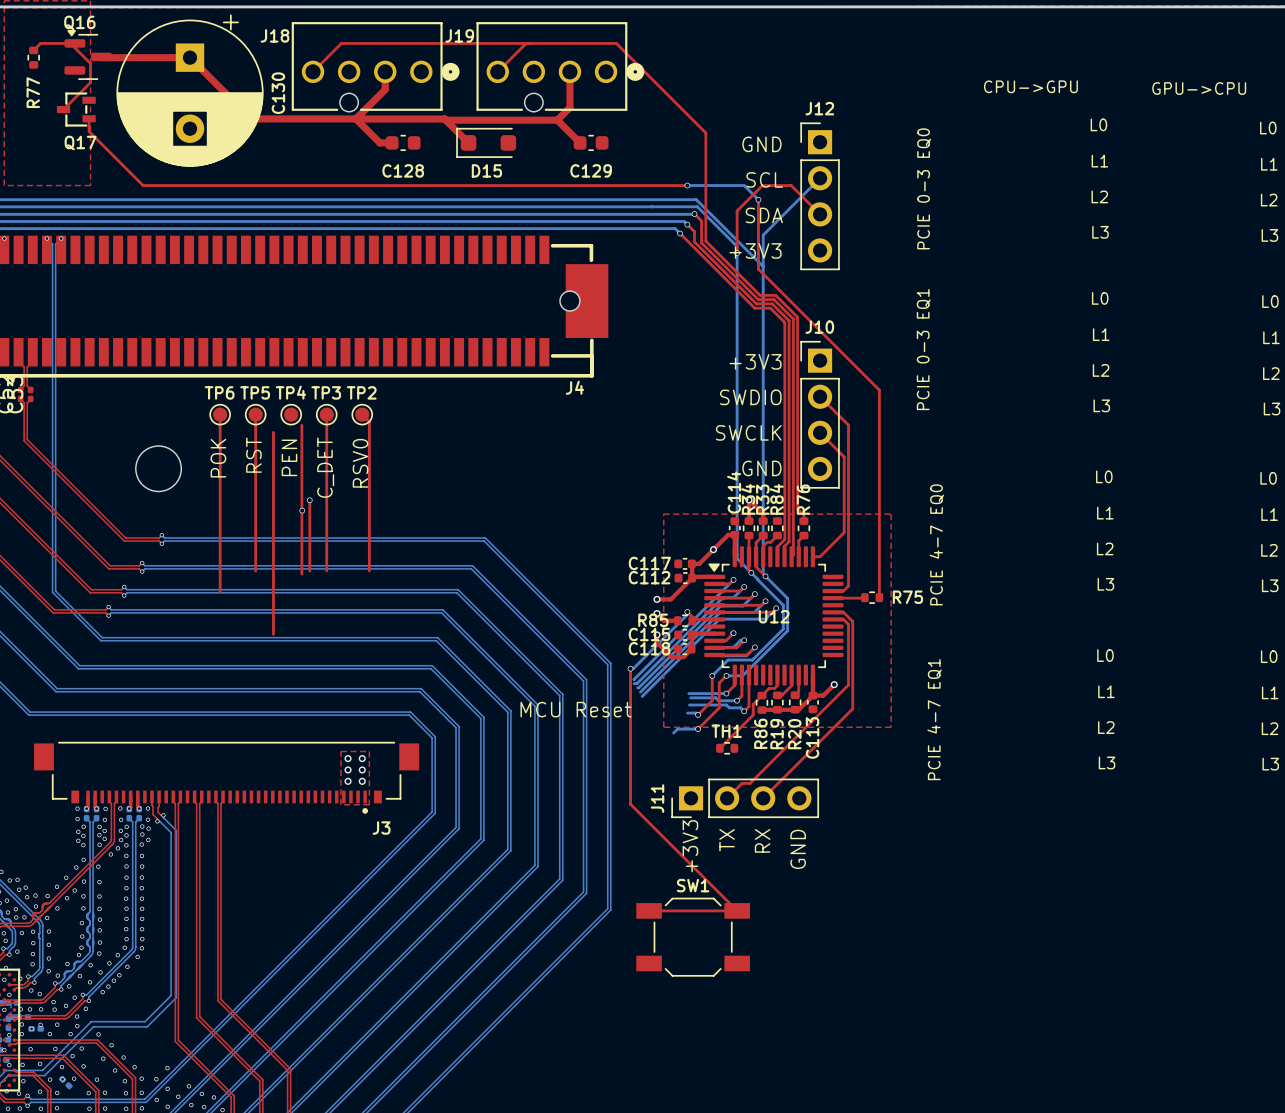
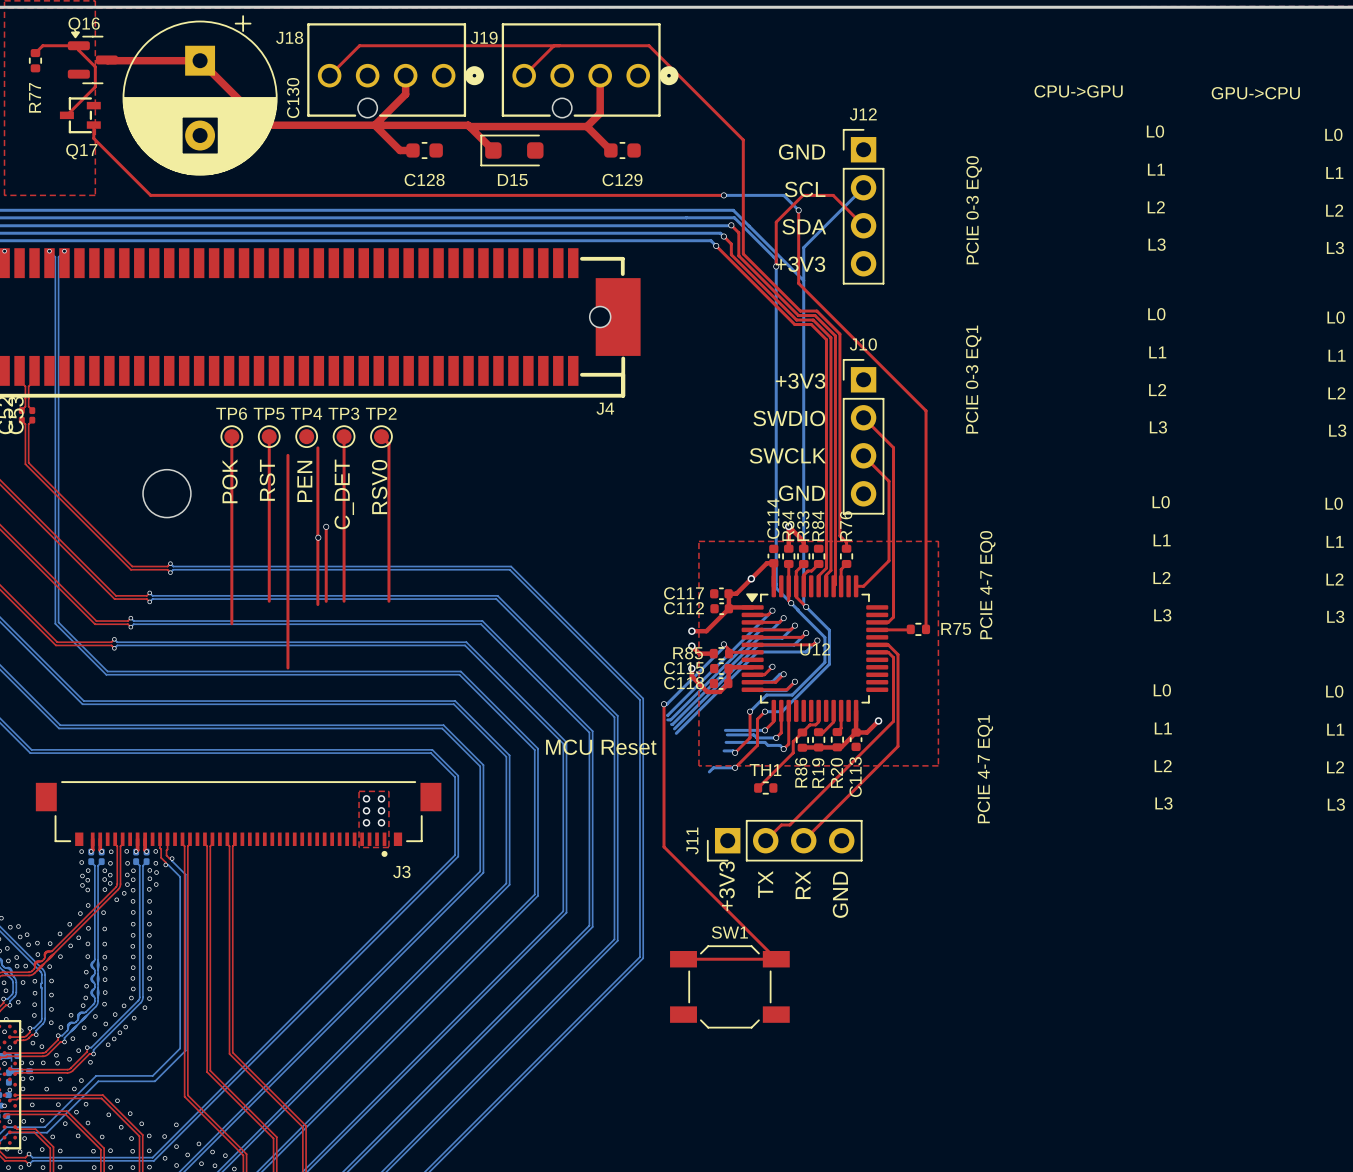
via: (77, 1016) -> none
via: none -> (31, 1078)
via: (40, 1024) -> none
via: (31, 1028) -> none
part: (36, 1028) -> none
via: none -> (46, 1089)
via: (49, 1034) -> none
via: (98, 1034) -> none
via: (62, 1079) -> none
part: (65, 1082) -> none

